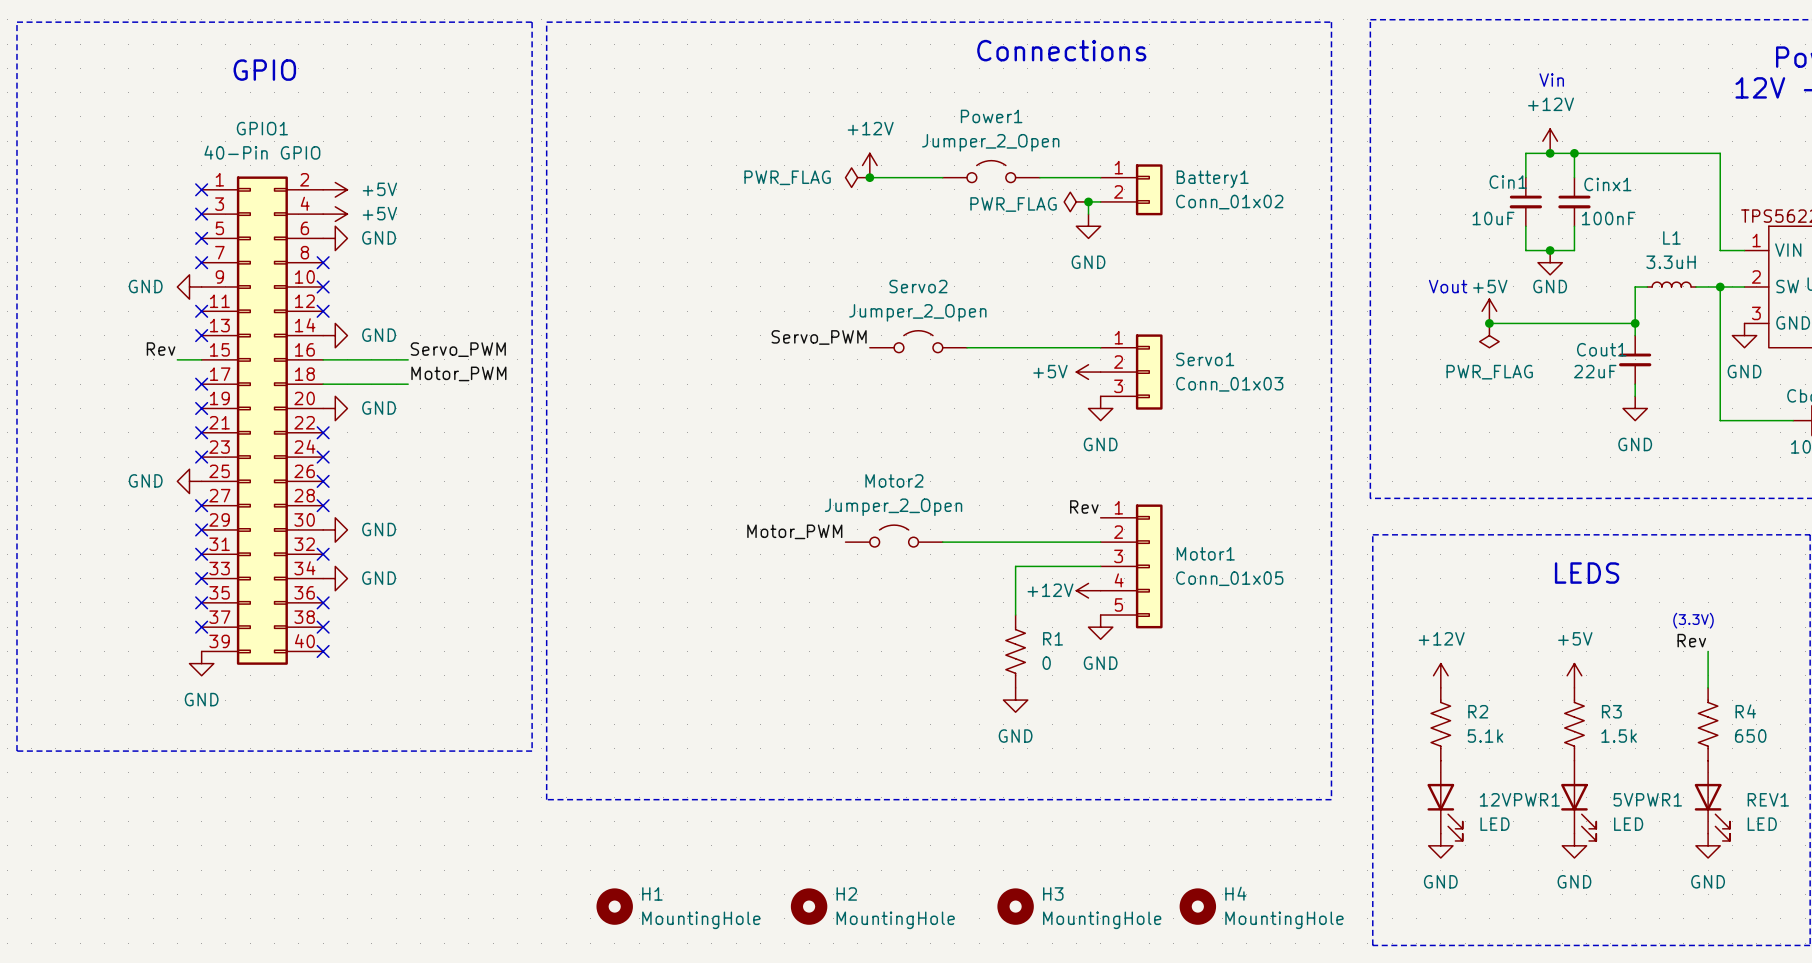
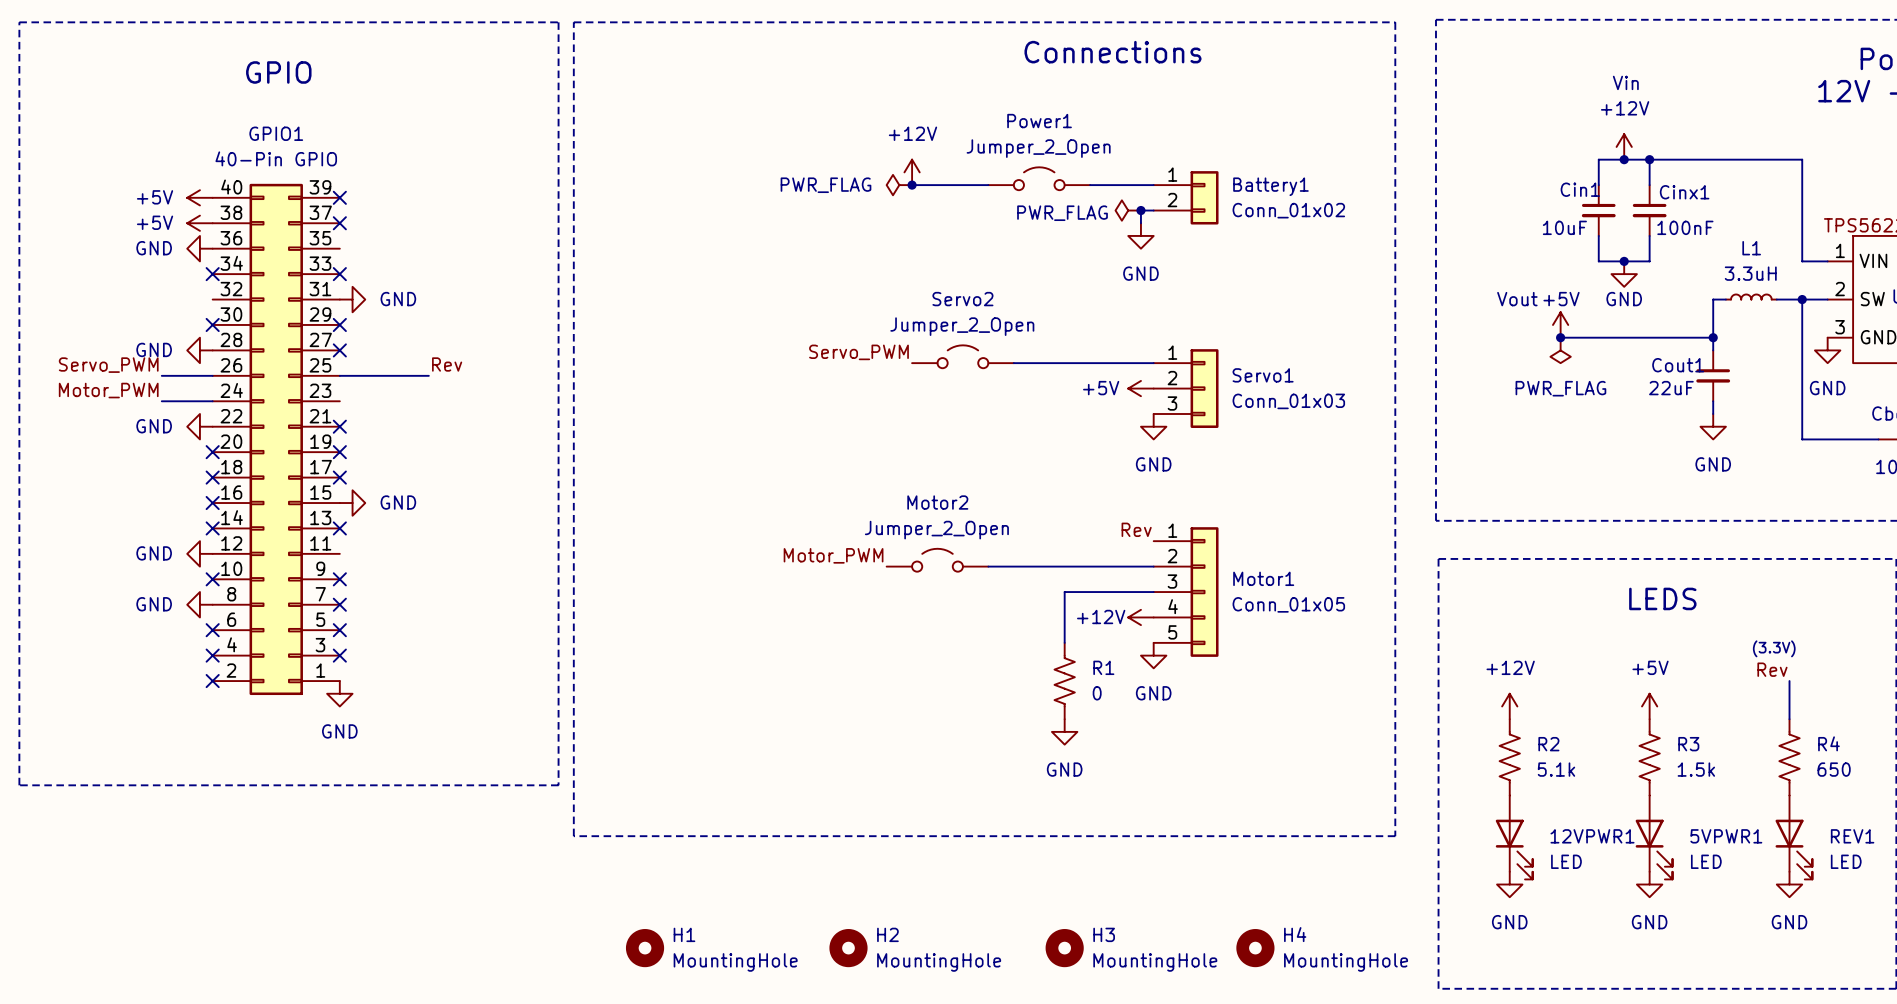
power symbol: none -> +5V (199, 197)
no-connect mark: (201, 189) -> none
no-connect mark: none -> (339, 197)
power symbol: +5V (335, 189) -> none
power symbol: none -> +5V (199, 223)
no-connect mark: (201, 214) -> none
no-connect mark: none -> (339, 223)
power symbol: +5V (335, 214) -> none
power symbol: none -> GND (199, 248)
no-connect mark: (201, 238) -> none
power symbol: GND (335, 238) -> none
power symbol: GND (189, 286) -> none
no-connect mark: (323, 286) -> none
power symbol: none -> GND (352, 299)
power symbol: none -> GND (199, 350)
no-connect mark: (201, 335) -> none
no-connect mark: none -> (339, 350)
power symbol: GND (335, 335) -> none
label: none -> Servo_PWM (108, 365)
label: Rev (161, 349) -> none
label: Servo_PWM (458, 349) -> Rev (447, 364)
wire: none -> (161, 375) (187, 375)
label: none -> Motor_PWM (108, 390)
label: Motor_PWM (458, 373) -> none
wire: none -> (161, 401) (212, 401)
no-connect mark: (201, 384) -> none
wire: (323, 384) (408, 384) -> none
power symbol: none -> GND (199, 426)
no-connect mark: (201, 408) -> none
no-connect mark: none -> (339, 426)
power symbol: GND (335, 408) -> none
GPIO1 rotation: 0° (262, 420) -> 180° (276, 439)
power symbol: GND (189, 481) -> none
no-connect mark: none -> (212, 503)
no-connect mark: (323, 481) -> none
power symbol: none -> GND (352, 503)
power symbol: none -> GND (199, 553)
no-connect mark: (201, 529) -> none
power symbol: GND (335, 529) -> none
power symbol: none -> GND (199, 604)
no-connect mark: (201, 578) -> none
no-connect mark: none -> (339, 604)
power symbol: GND (335, 578) -> none
no-connect mark: none -> (212, 681)
no-connect mark: (323, 651) -> none
power symbol: GND (201, 663) -> none
power symbol: none -> GND (339, 693)

